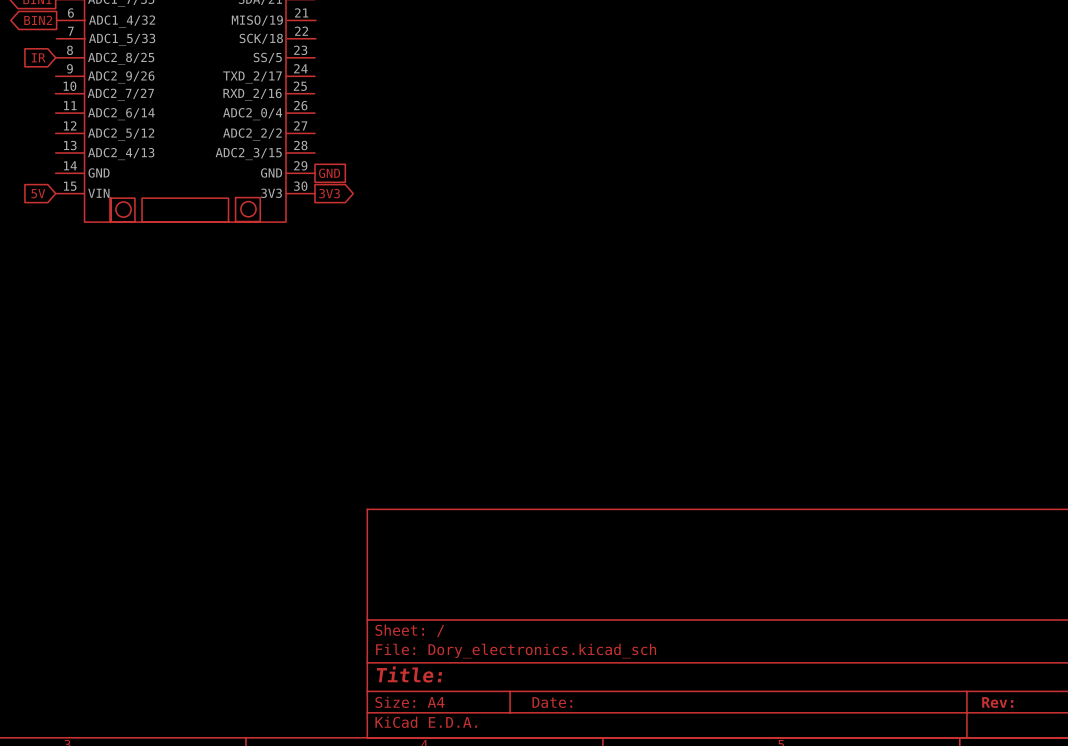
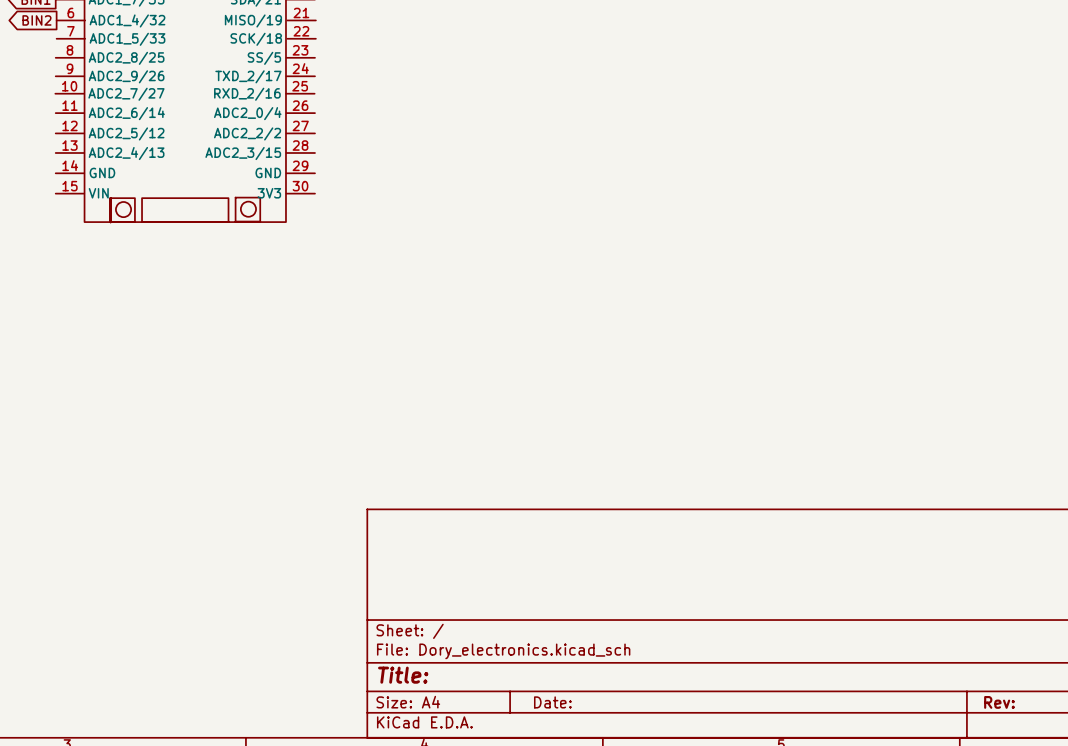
global label: IR (38, 57) -> none
global label: GND (329, 173) -> none
global label: 5V (38, 193) -> none
global label: 3V3 (329, 193) -> none

